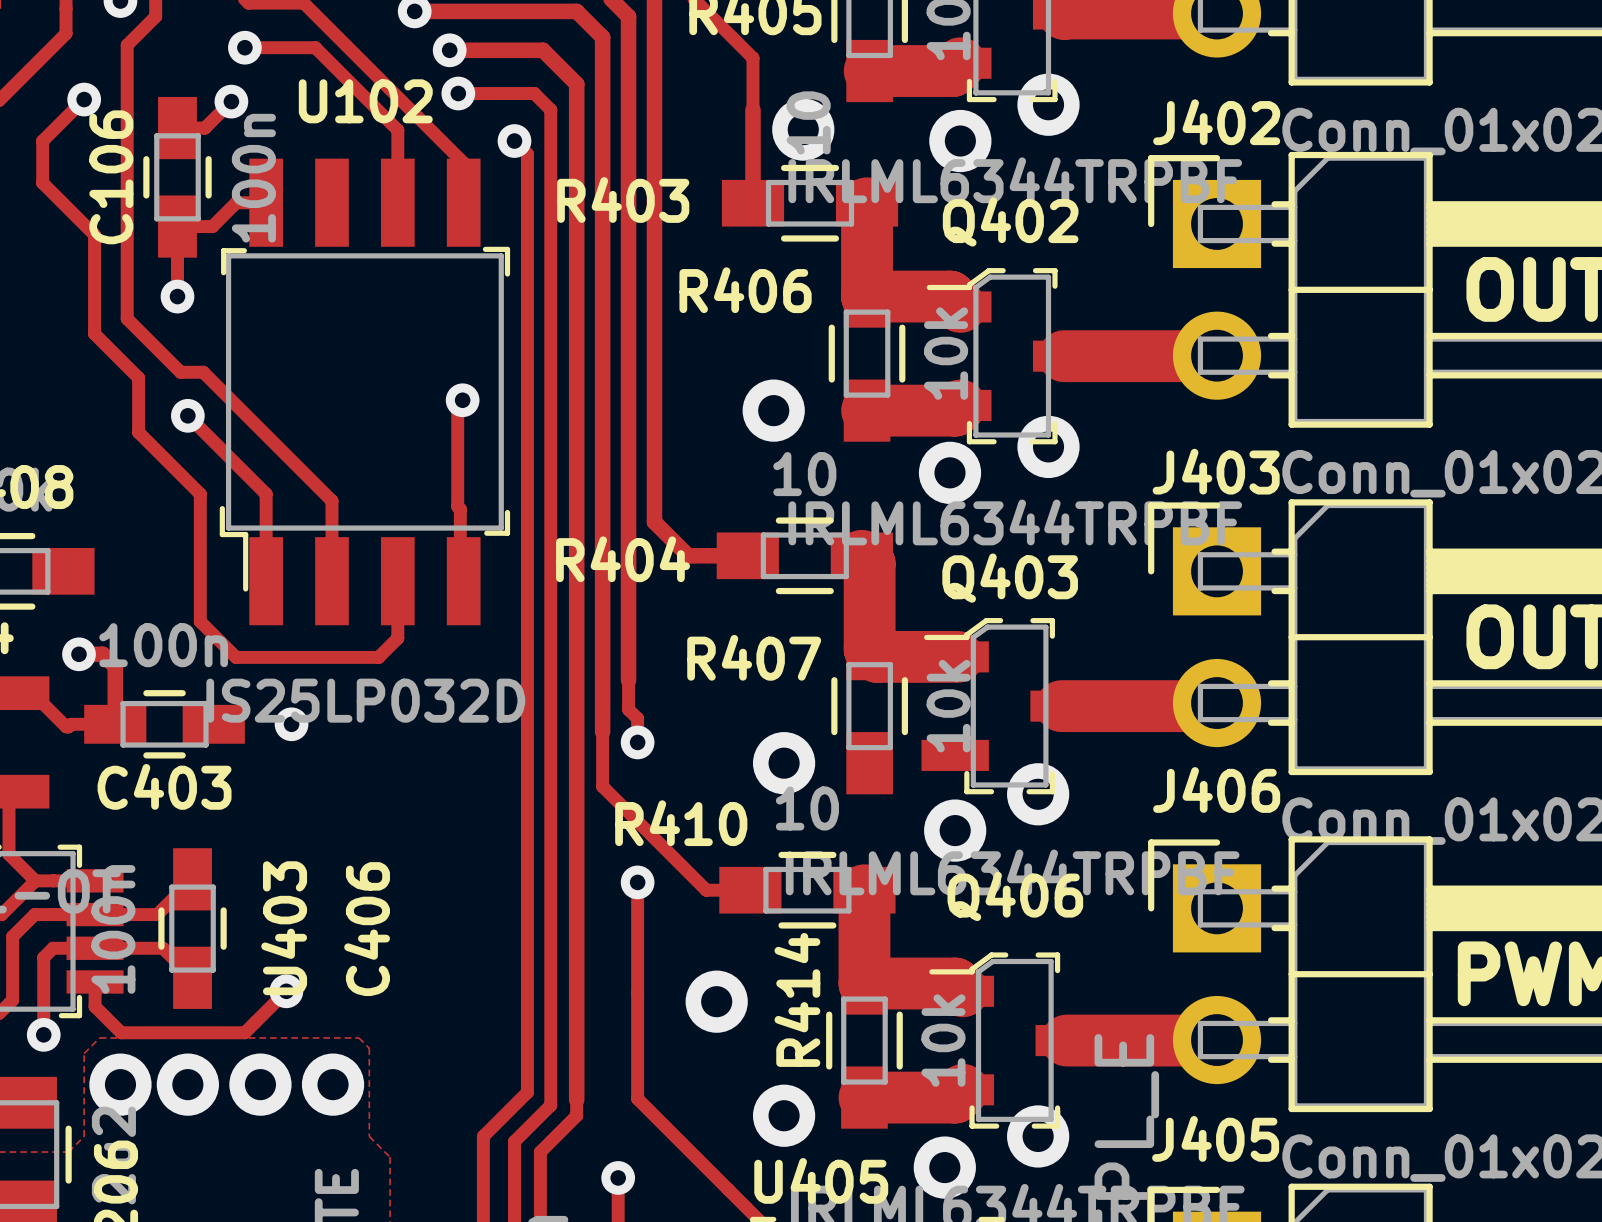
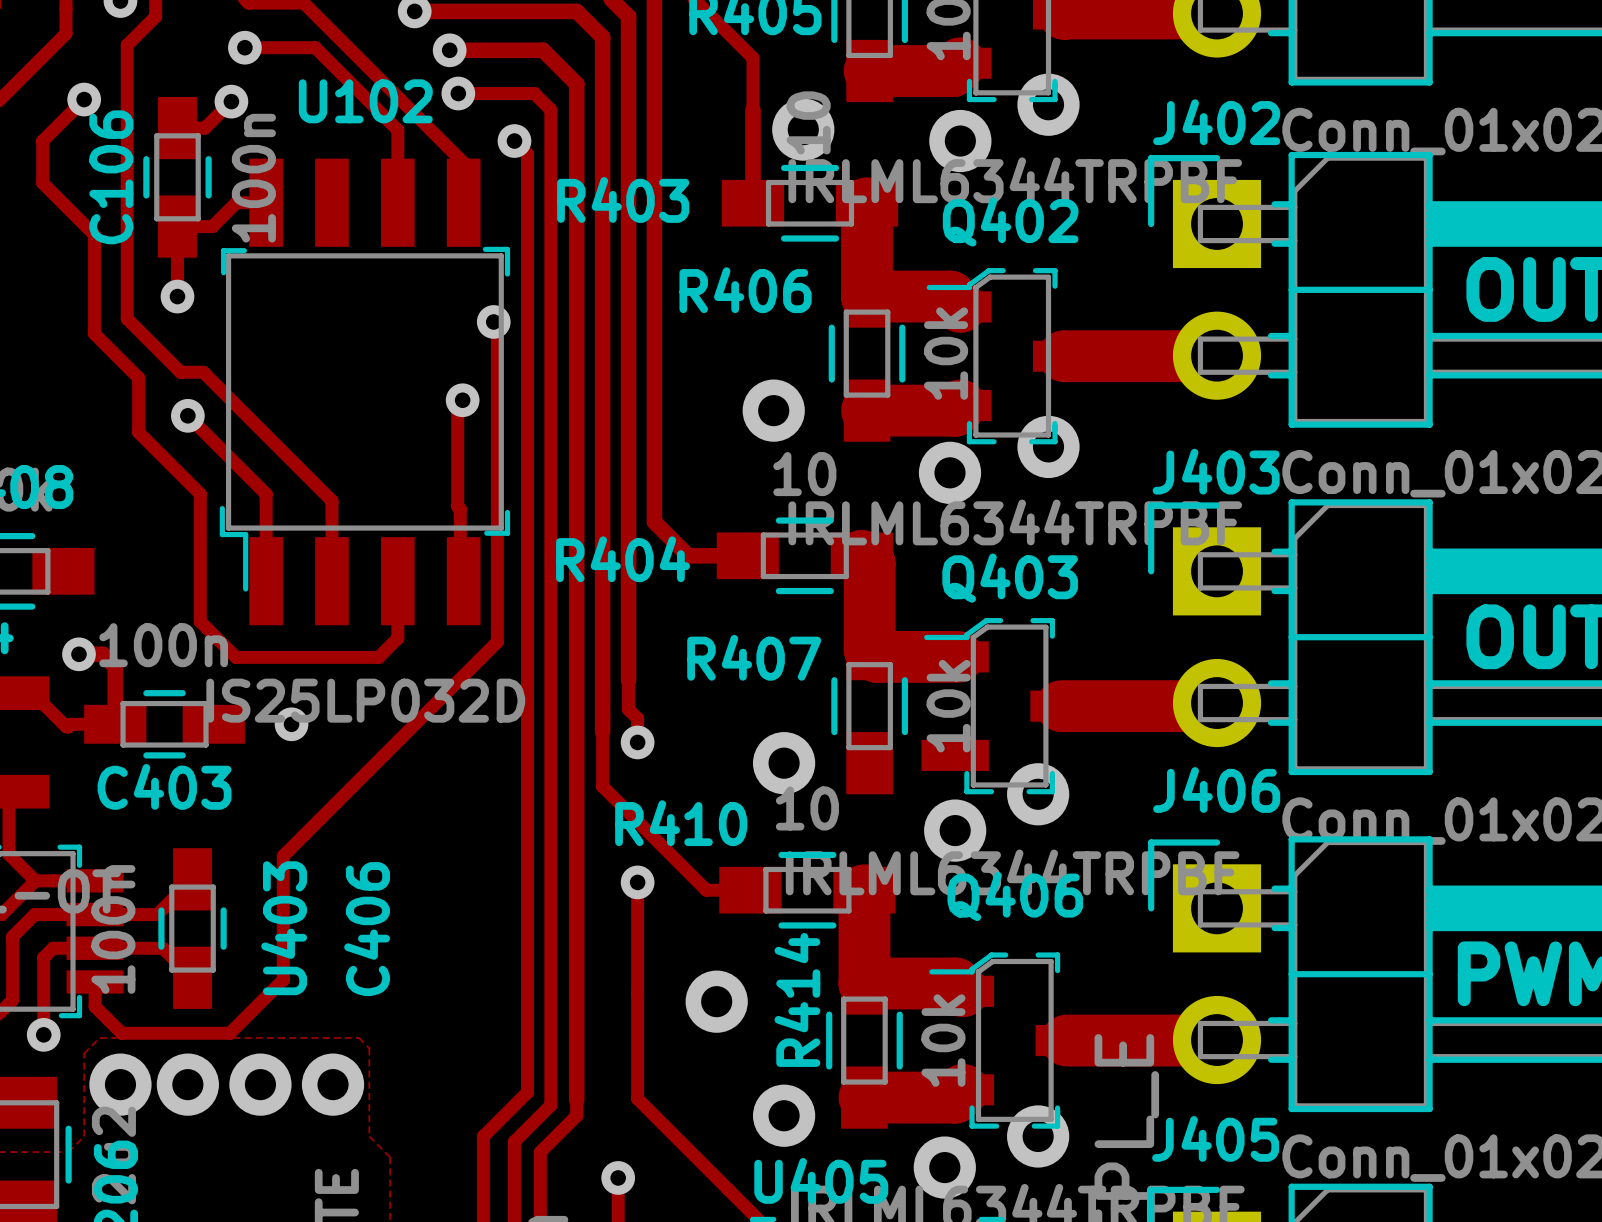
via: none -> (493, 321)
track: (286, 991) (244, 1032) (121, 1032) -> (493, 321) (497, 325) (497, 641) (283, 855) (283, 979) (229, 1033) (121, 1033)
via: (286, 991) -> none

